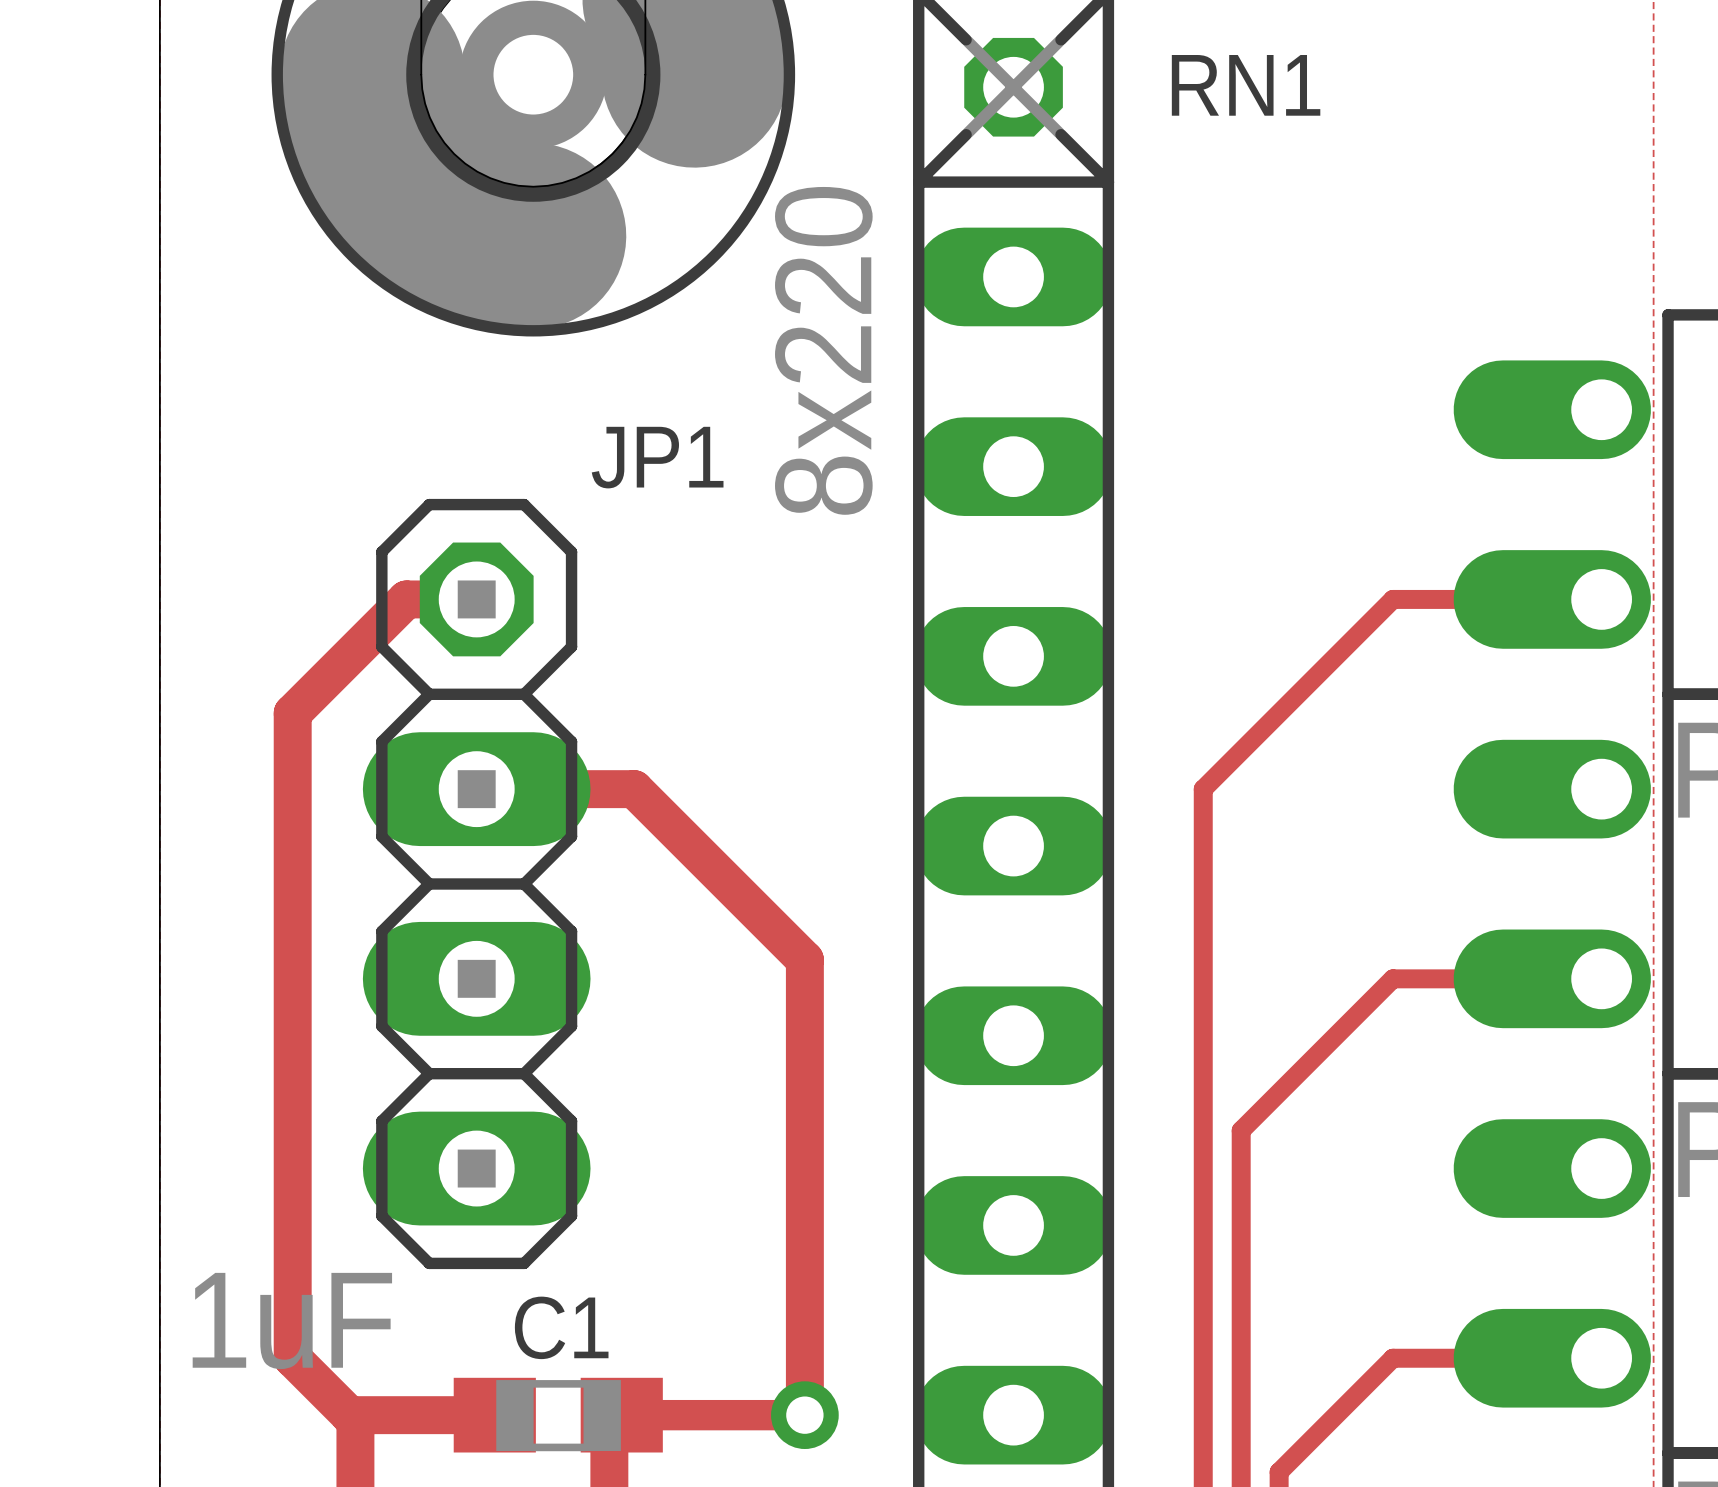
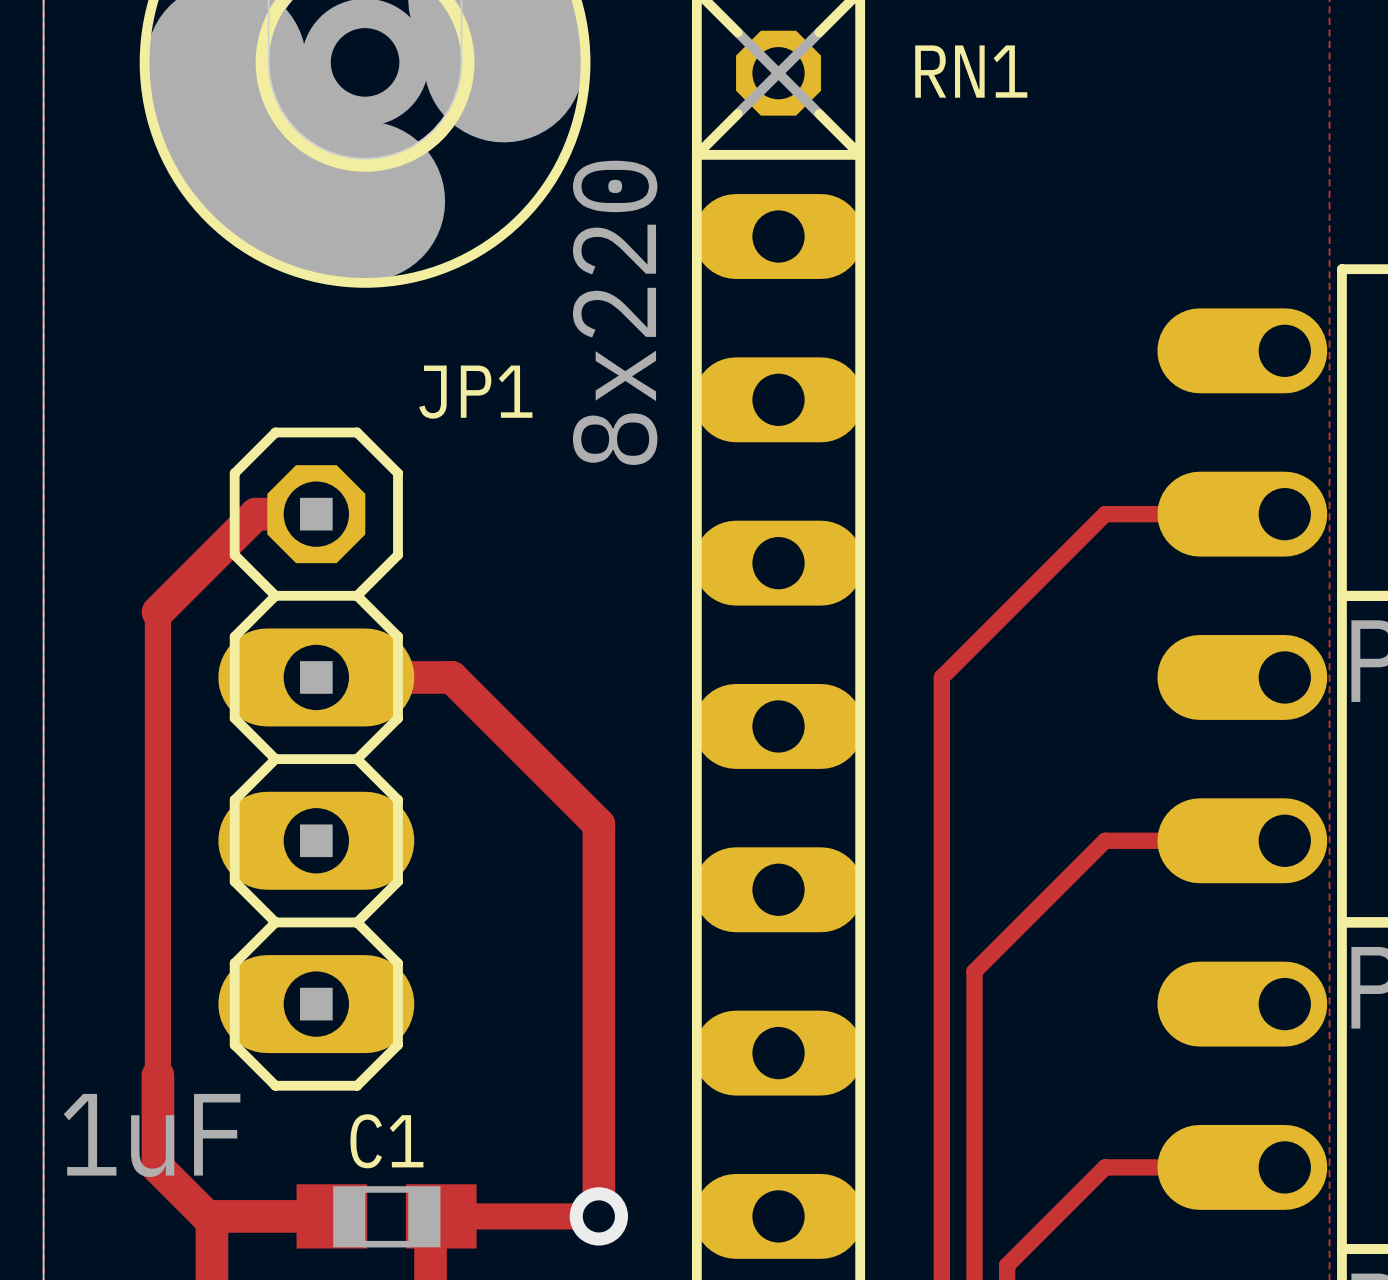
track width: thick (292, 713) (292, 1251) -> thin (157, 612) (157, 1075)

